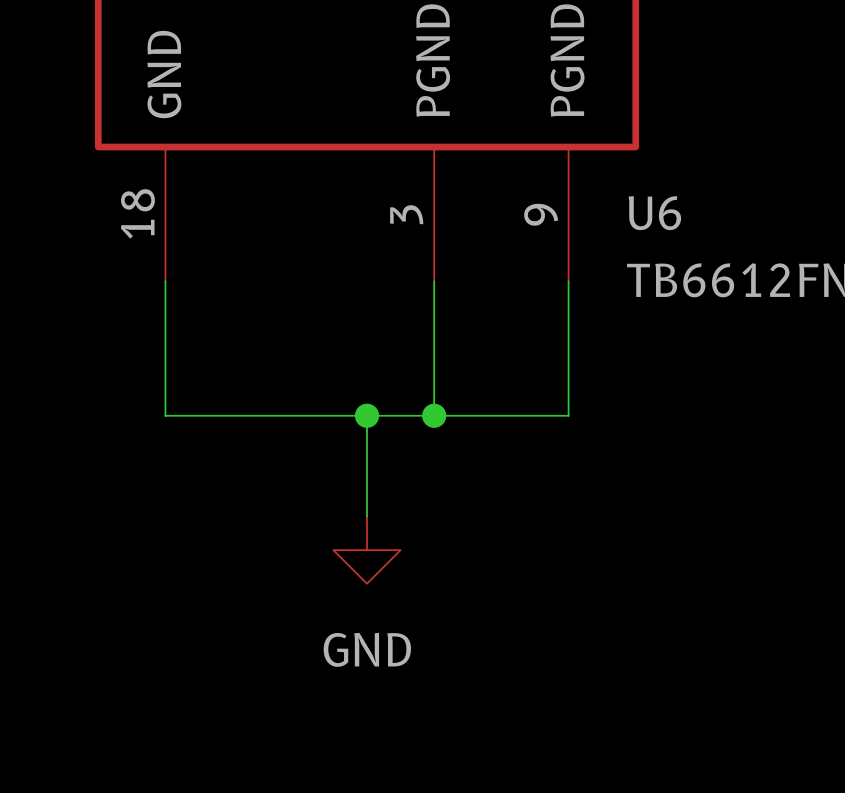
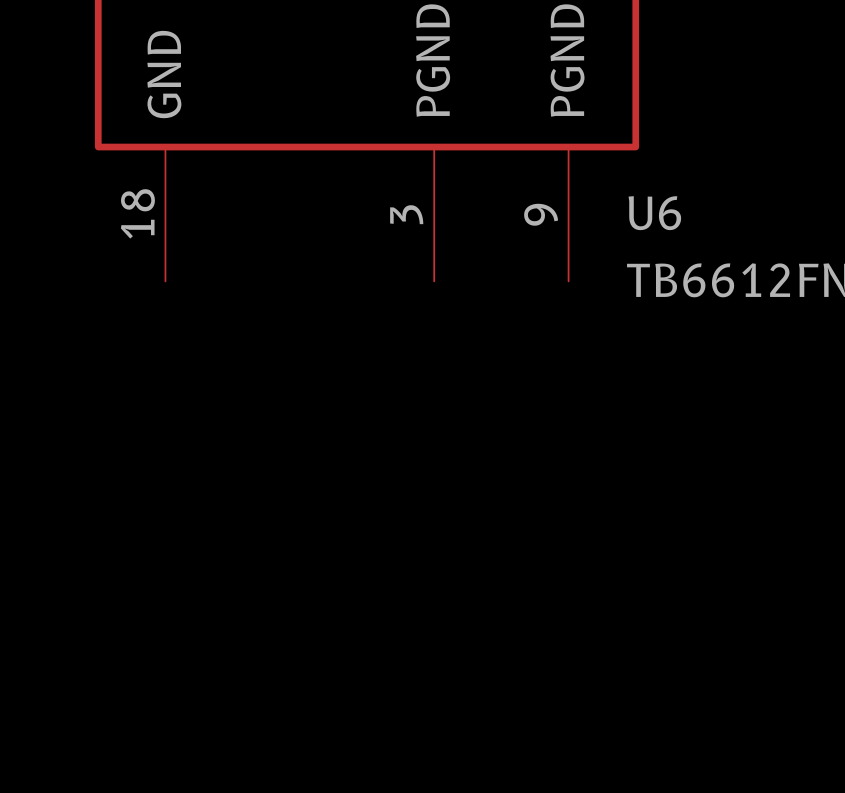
wire: (165, 281) (165, 415) (568, 415) (568, 281) -> none
wire: (434, 281) (434, 415) -> none
wire: (367, 415) (367, 516) -> none
junction: (367, 415) -> none
junction: (434, 415) -> none
power symbol: GND (367, 550) -> none

